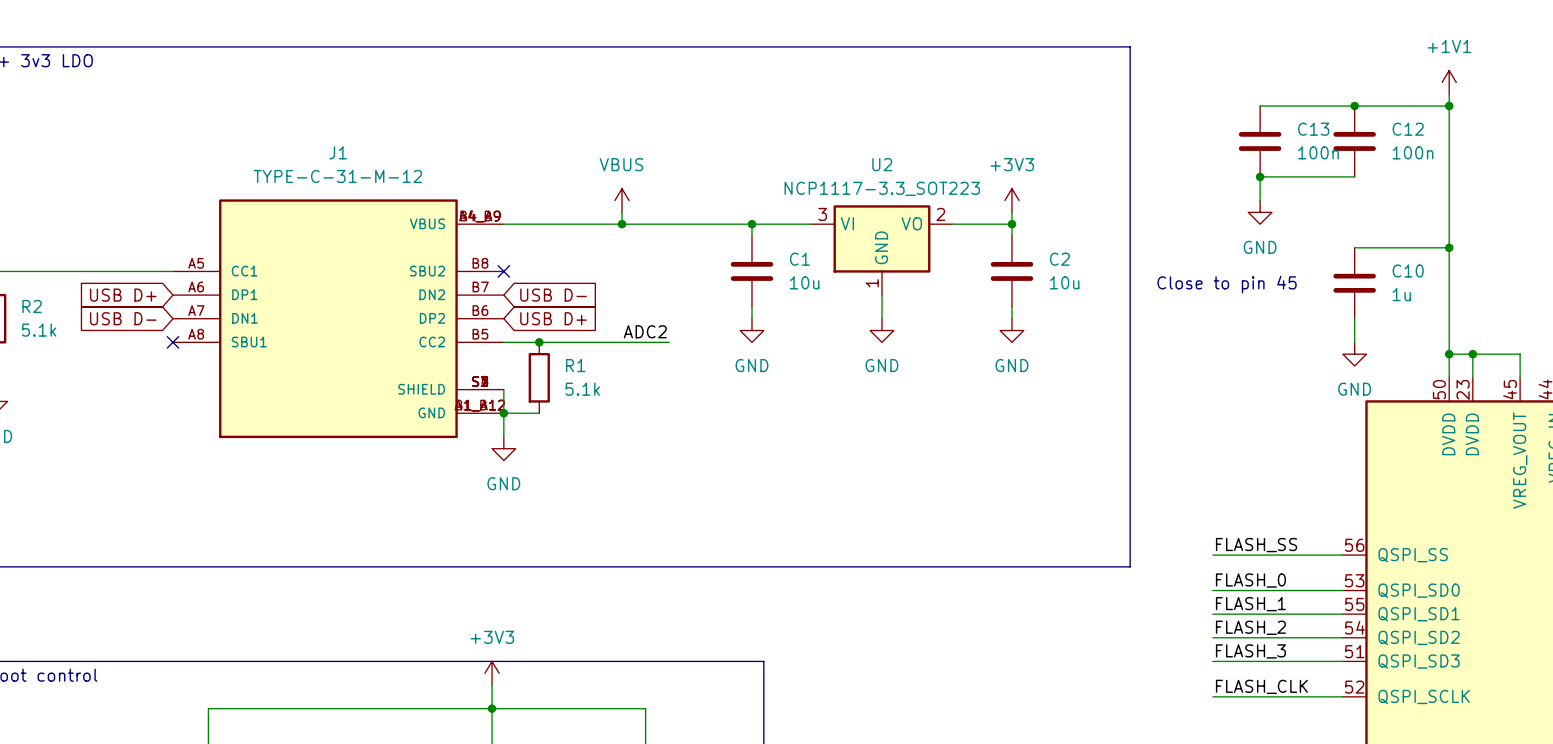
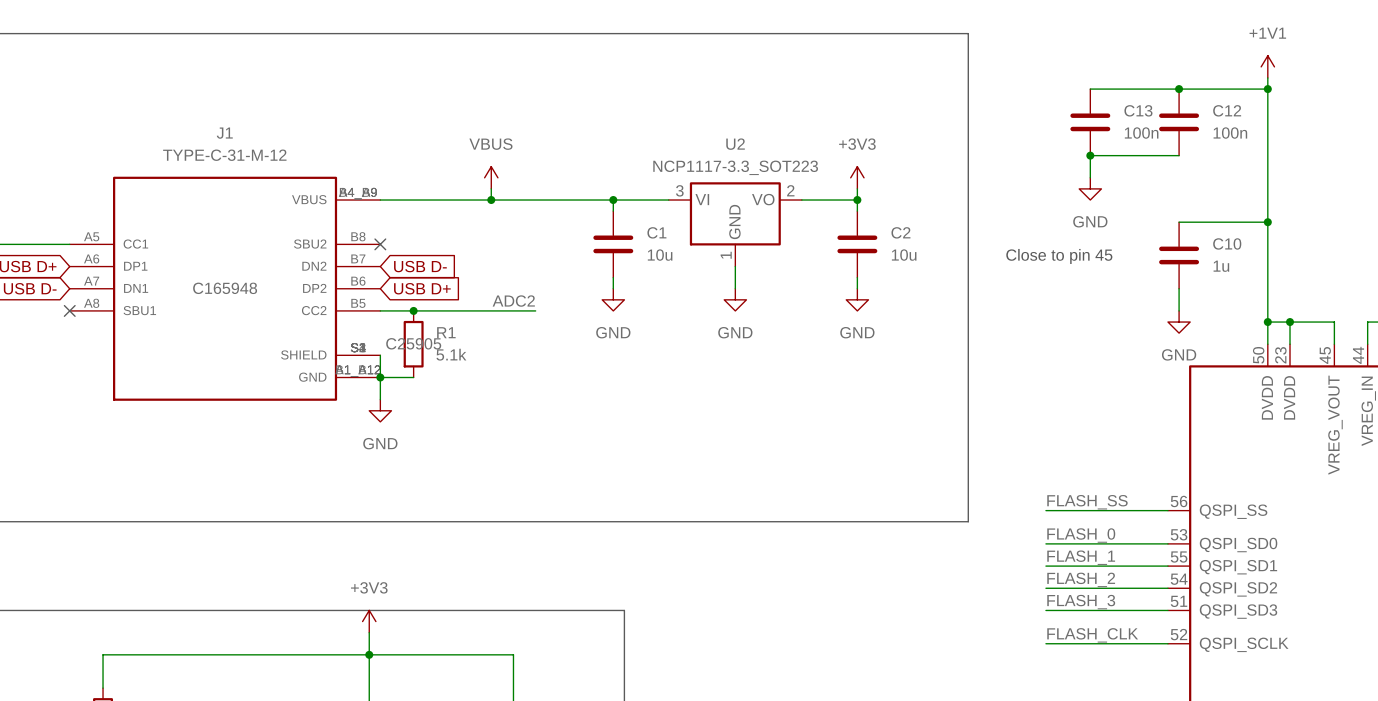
J1 text: none -> C165948 (225, 288)
R1 text: none -> C25905 (413, 343)

